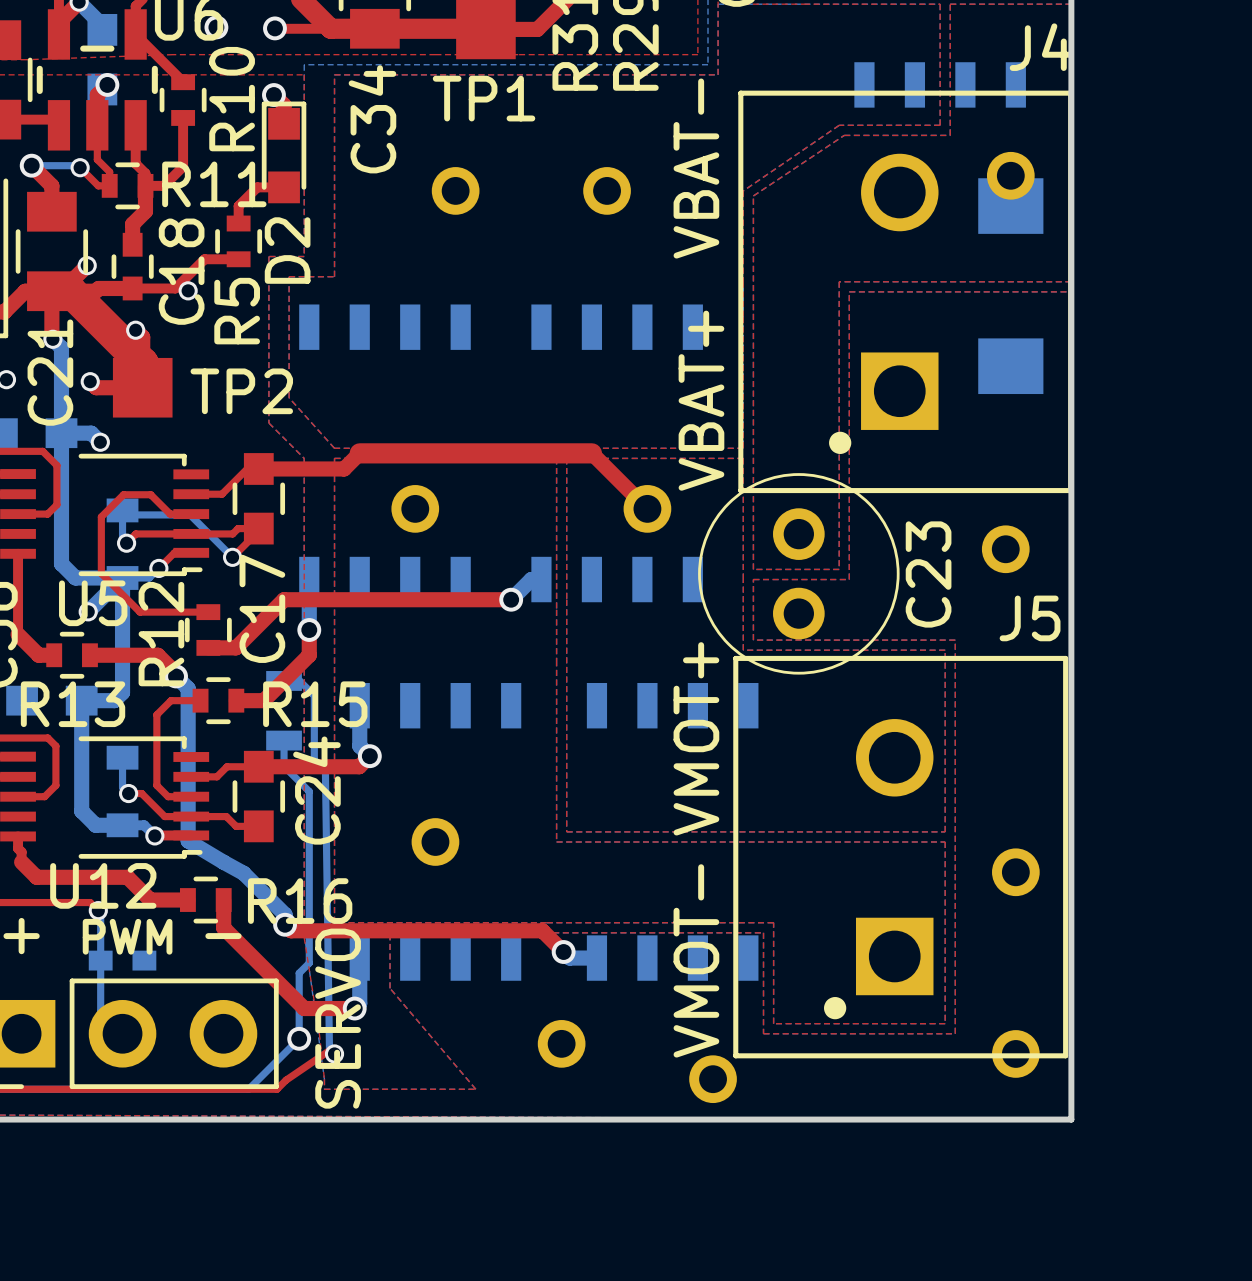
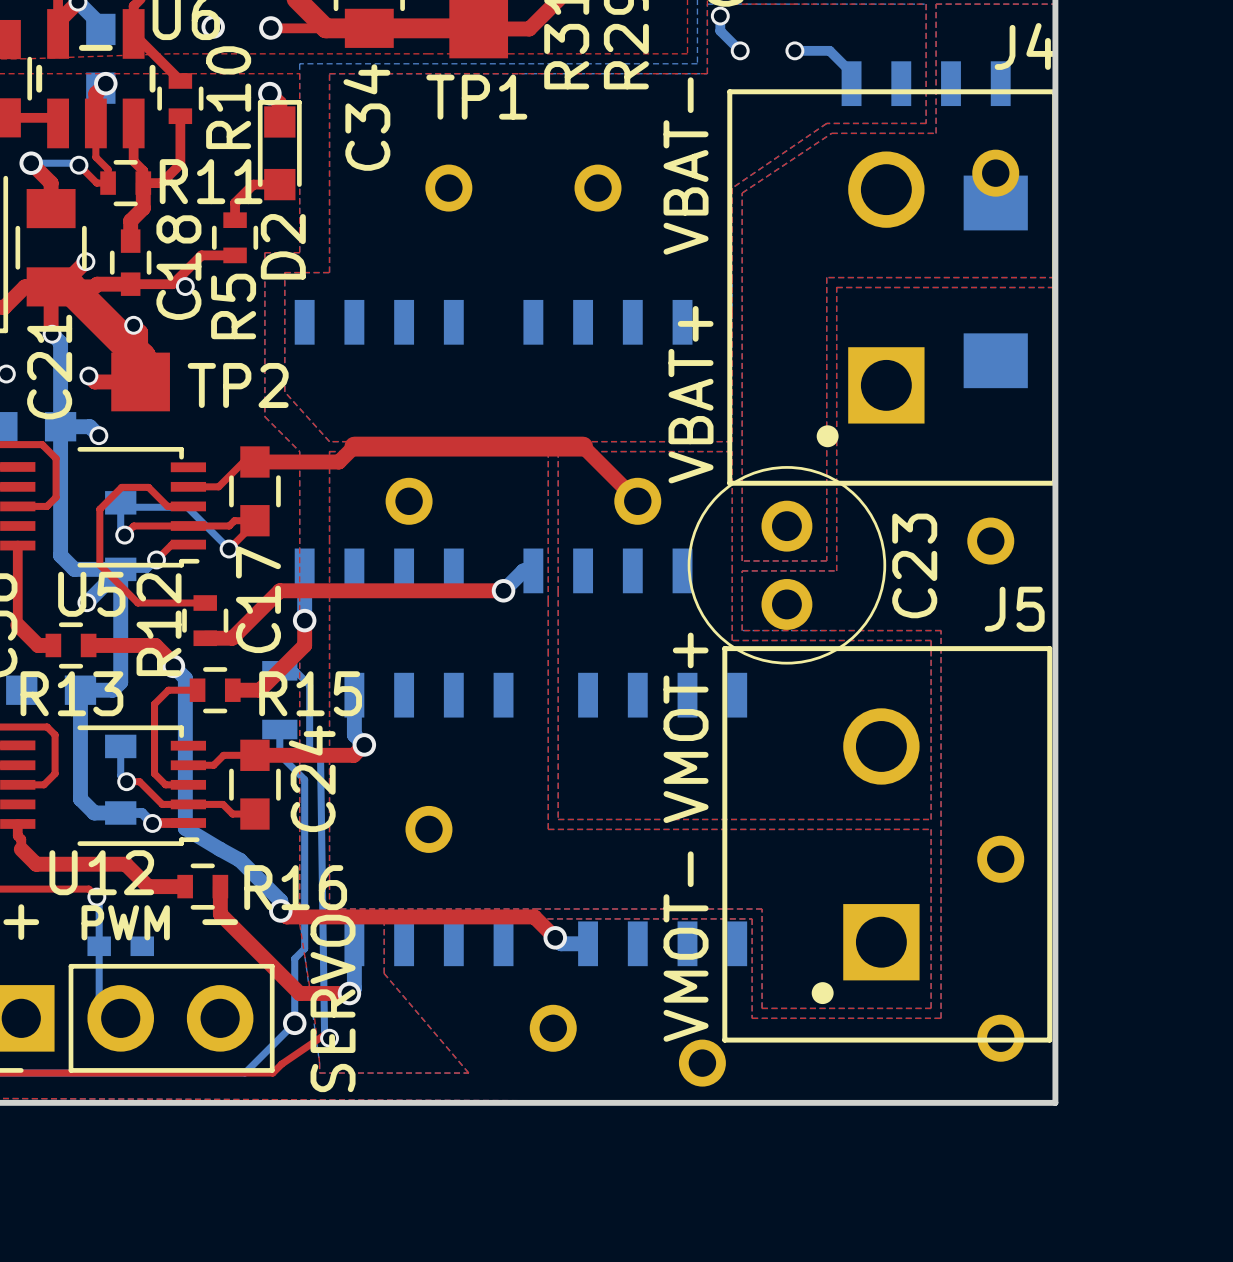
bottom track: none -> (720, 16) (720, 30) (740, 50)
via: none -> (720, 16)
via: none -> (740, 50)
bottom track: none -> (794, 50) (829, 50) (851, 72) (851, 83)
via: none -> (794, 50)

